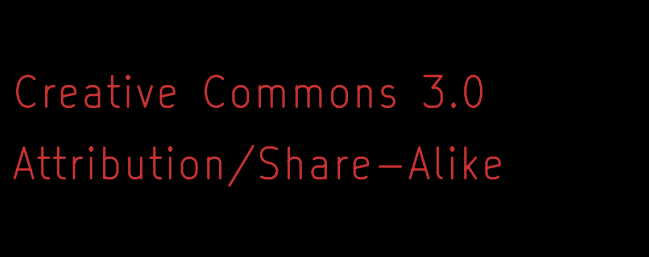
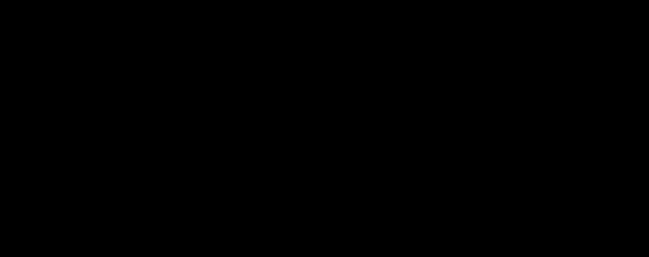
text: Creative Commons 3.0 (249, 91) -> none
text: Attribution/Share-Alike (257, 165) -> none

